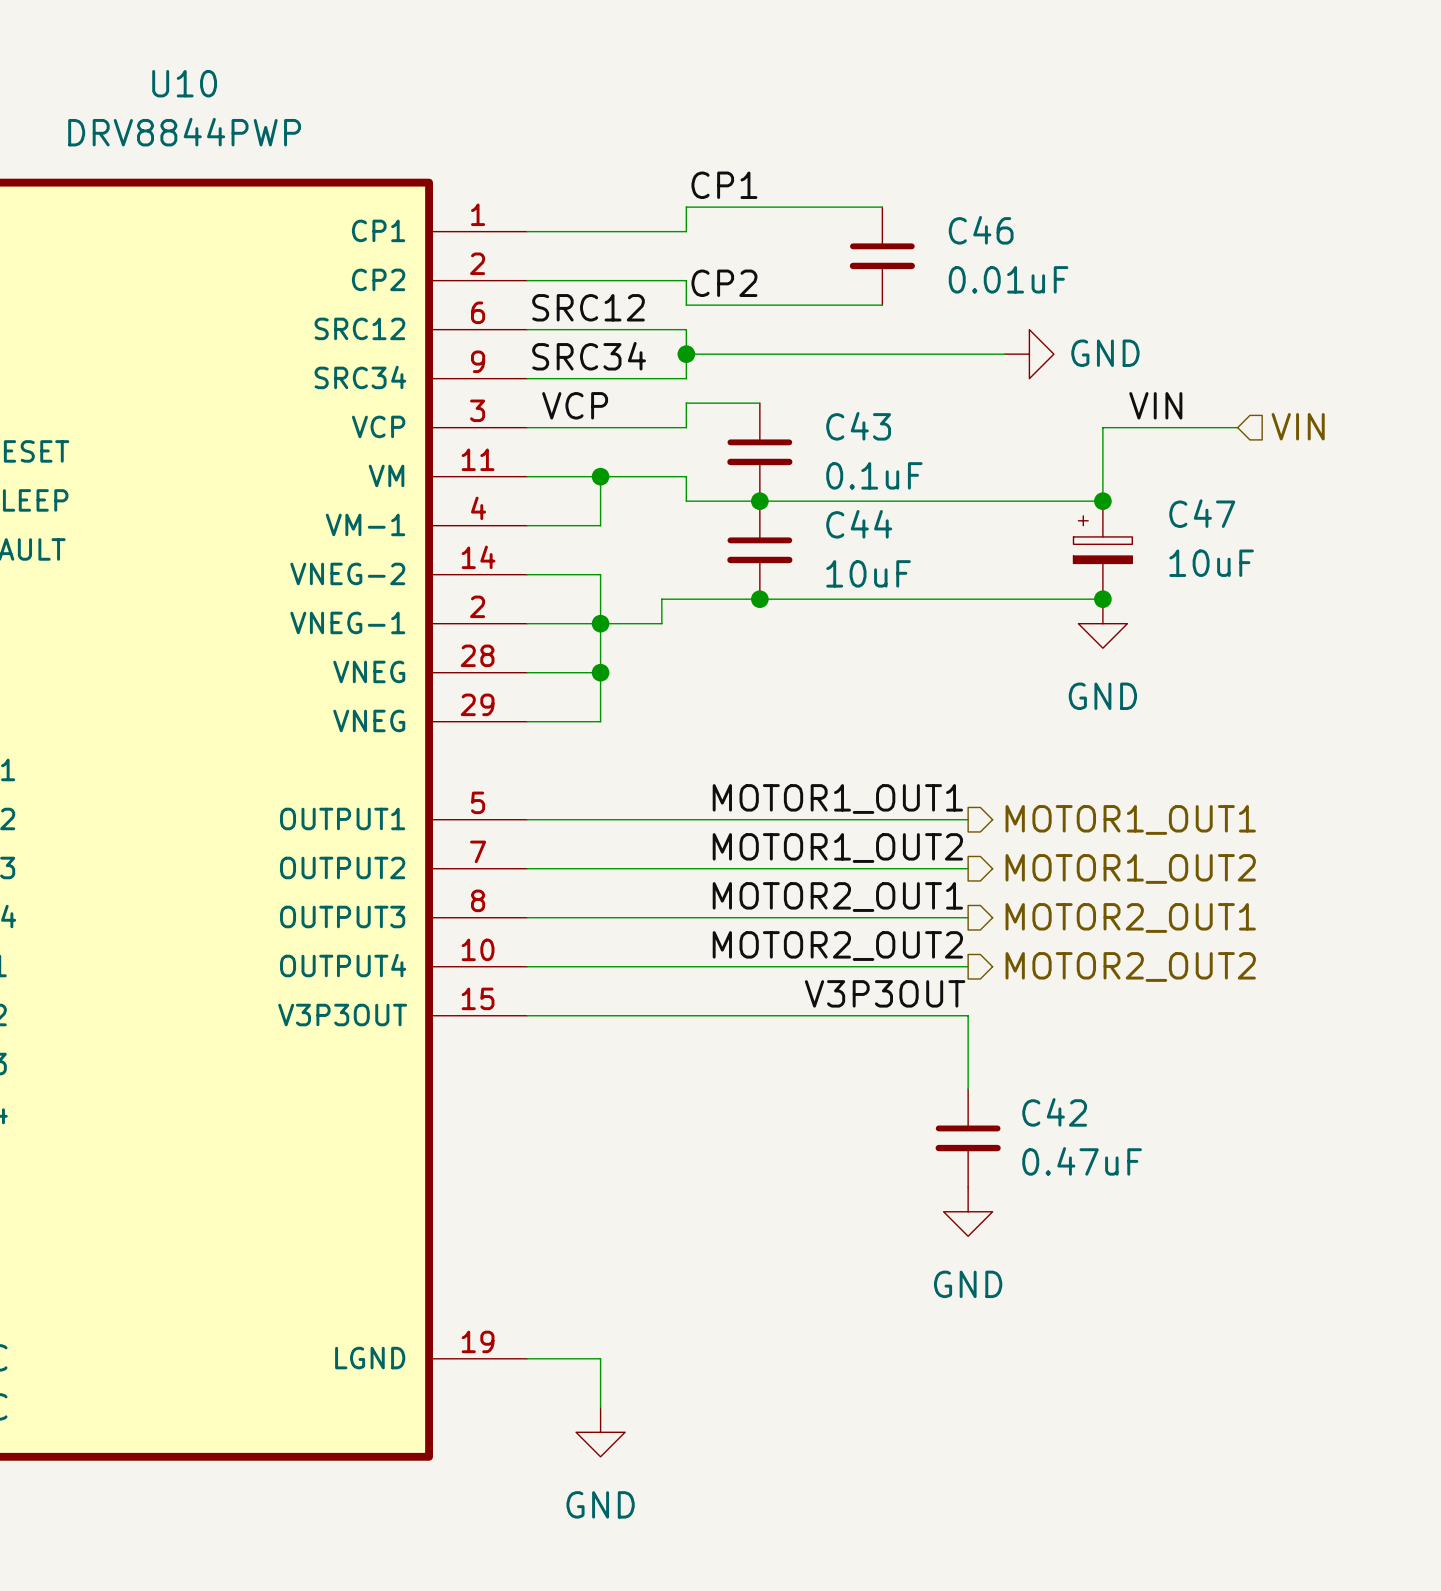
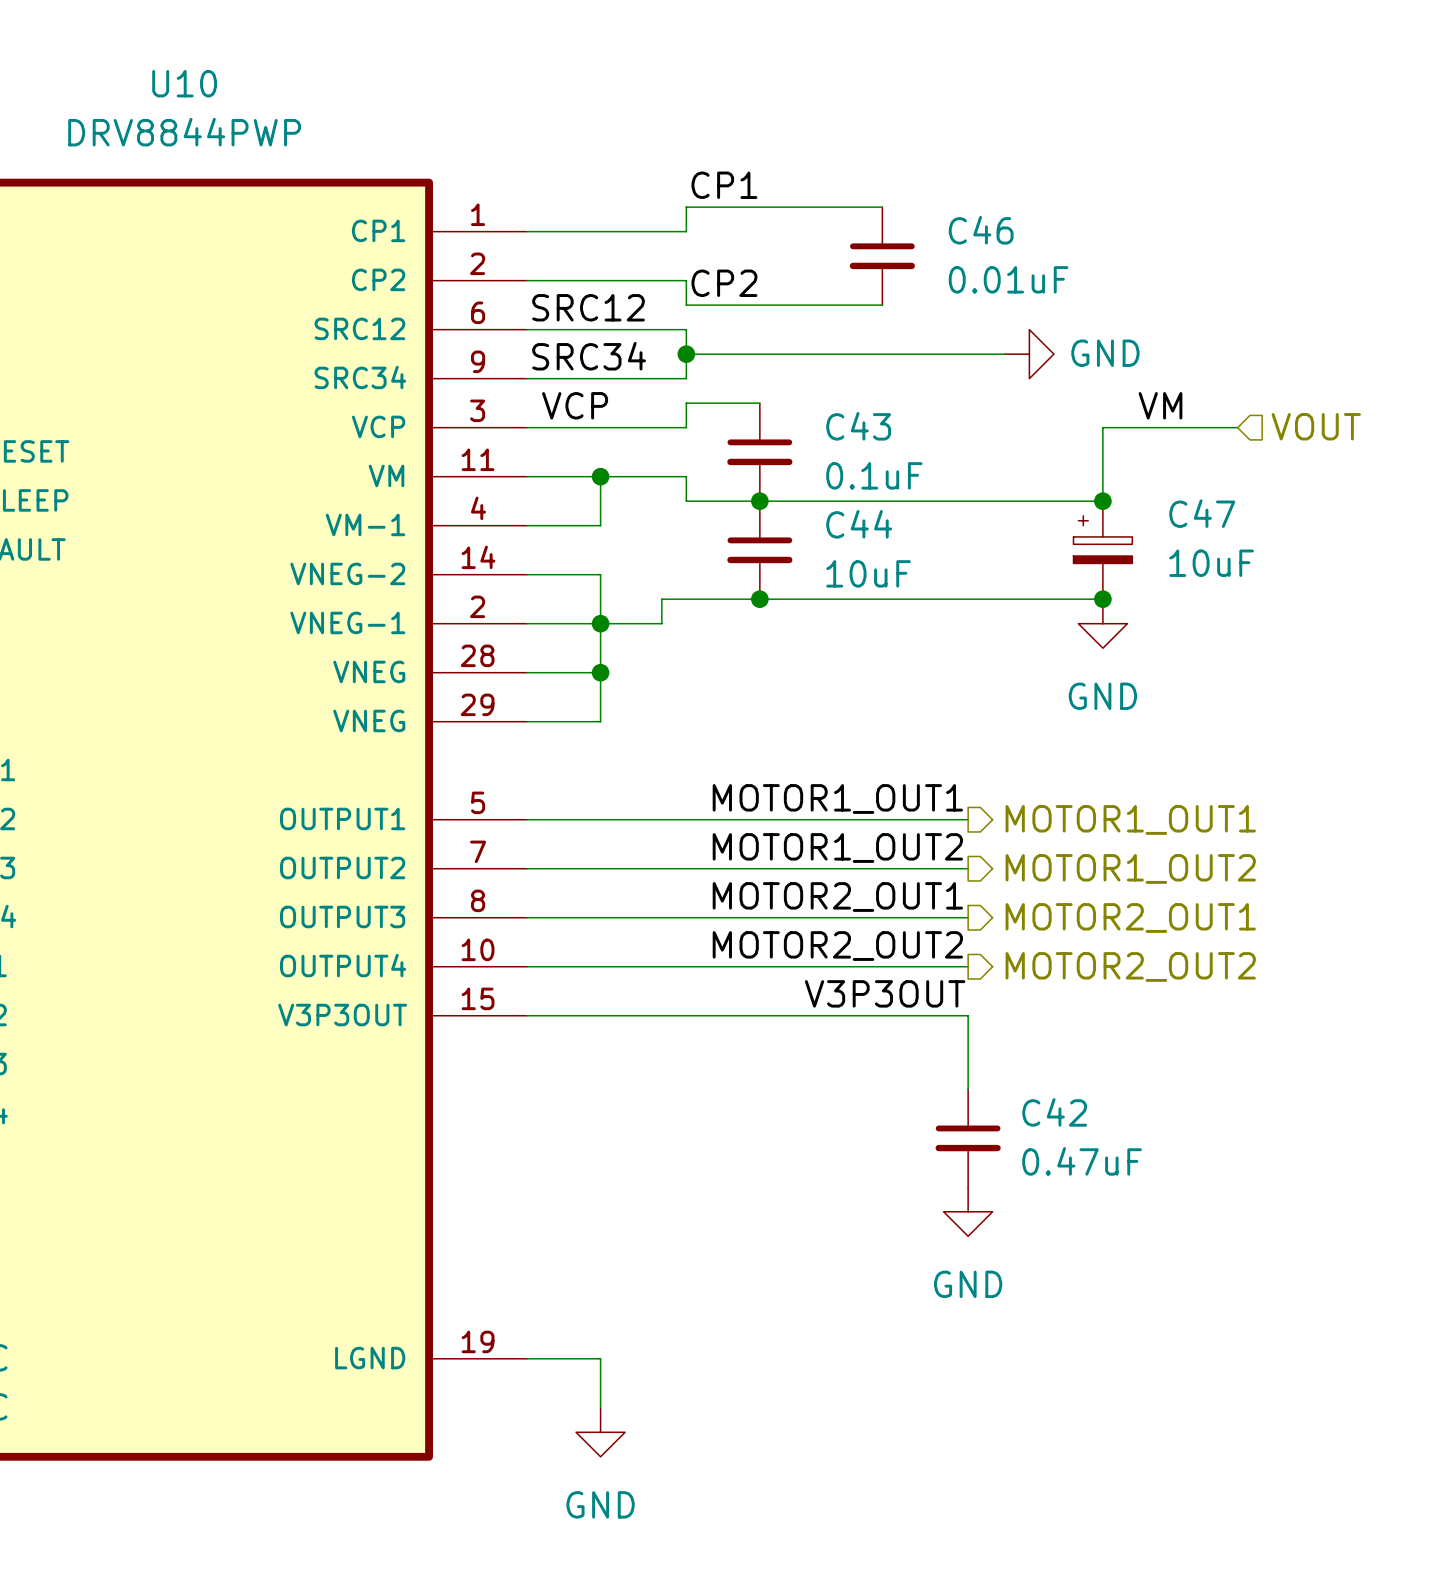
label: VIN (1155, 405) -> VM (1160, 405)
hierarchical label: VIN (1298, 426) -> VOUT (1316, 426)

